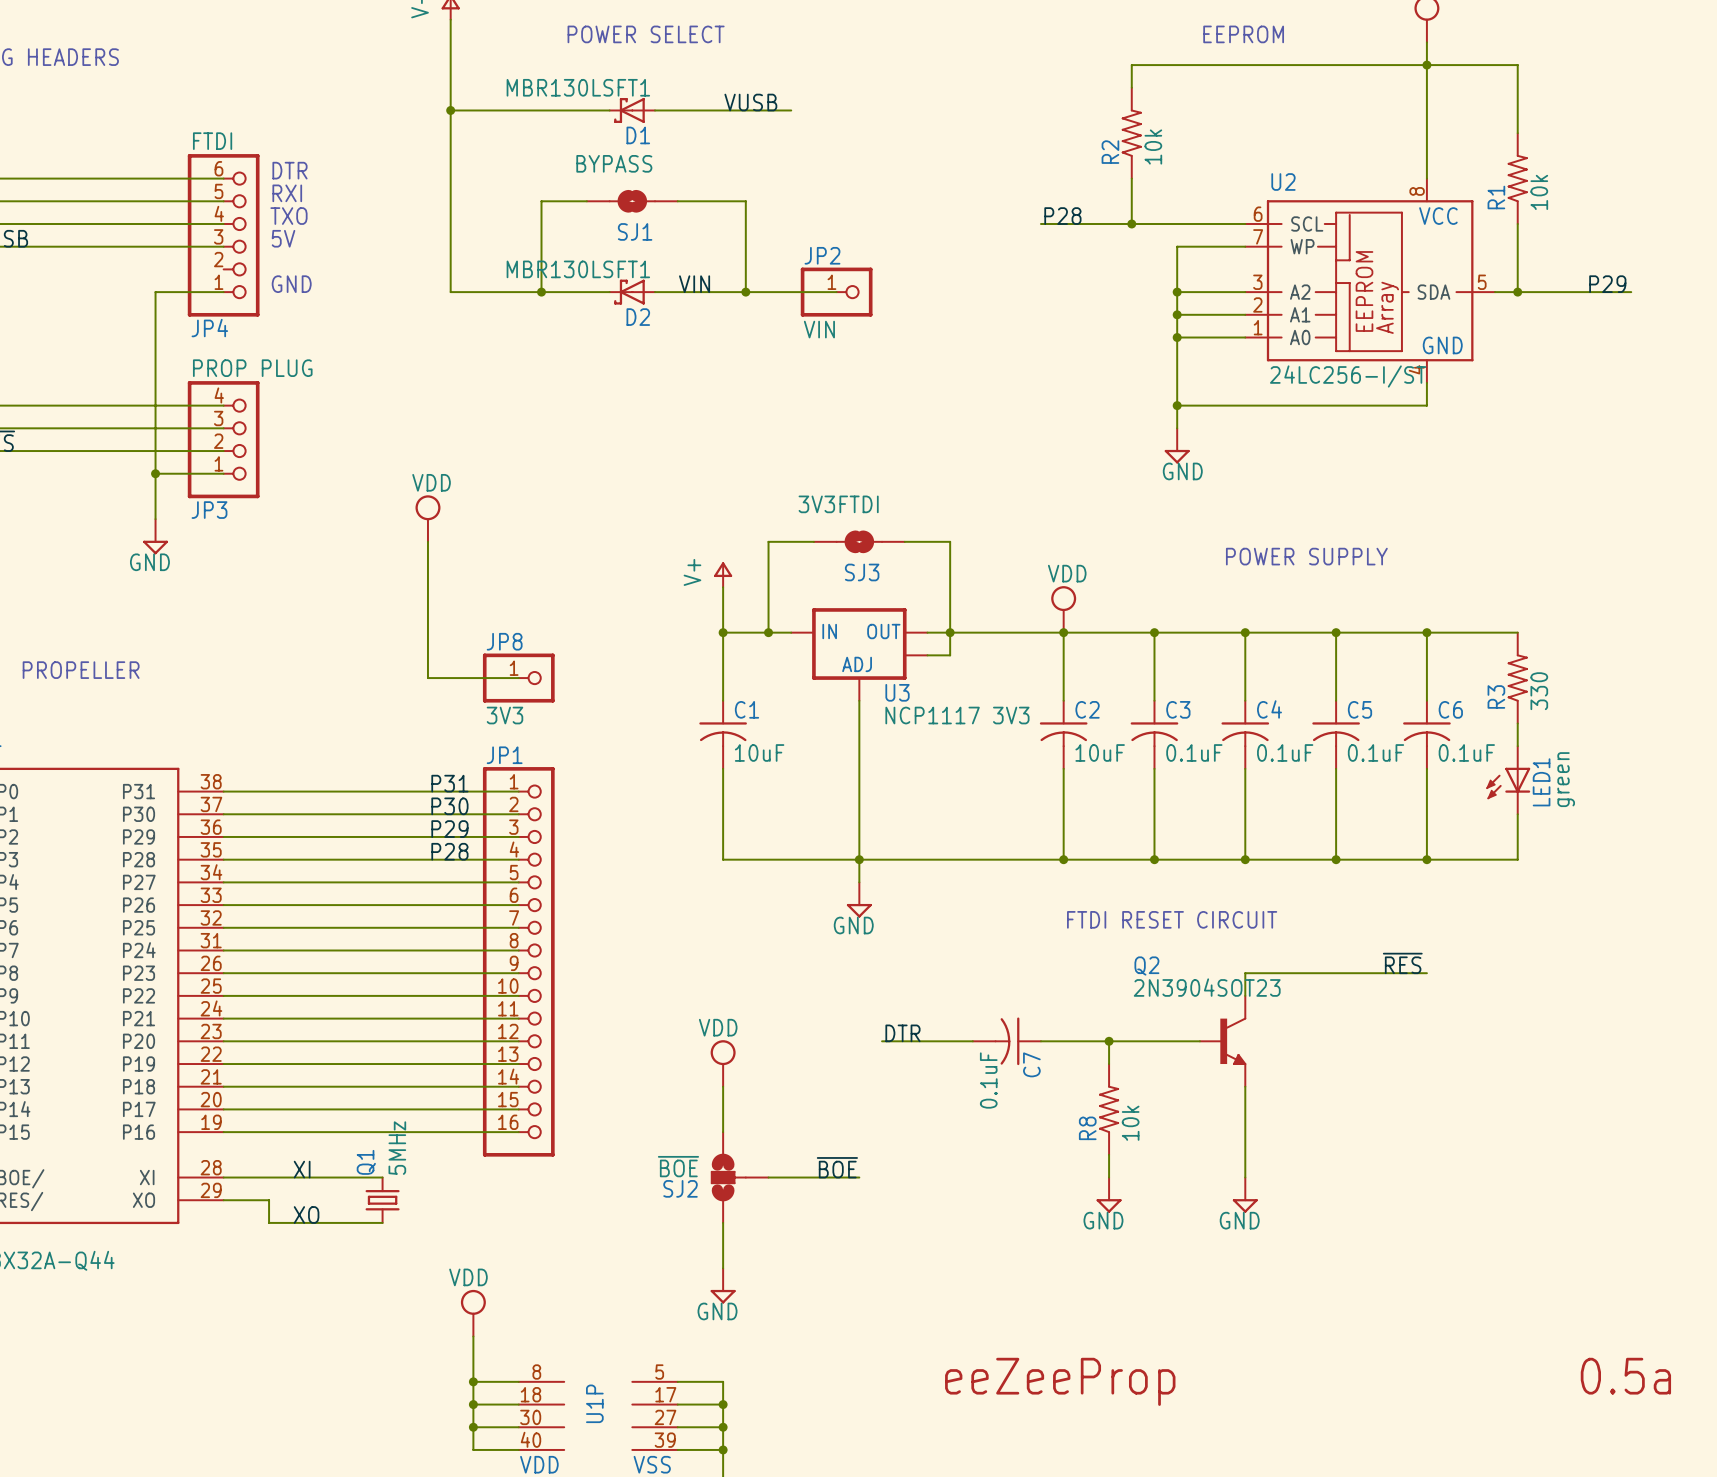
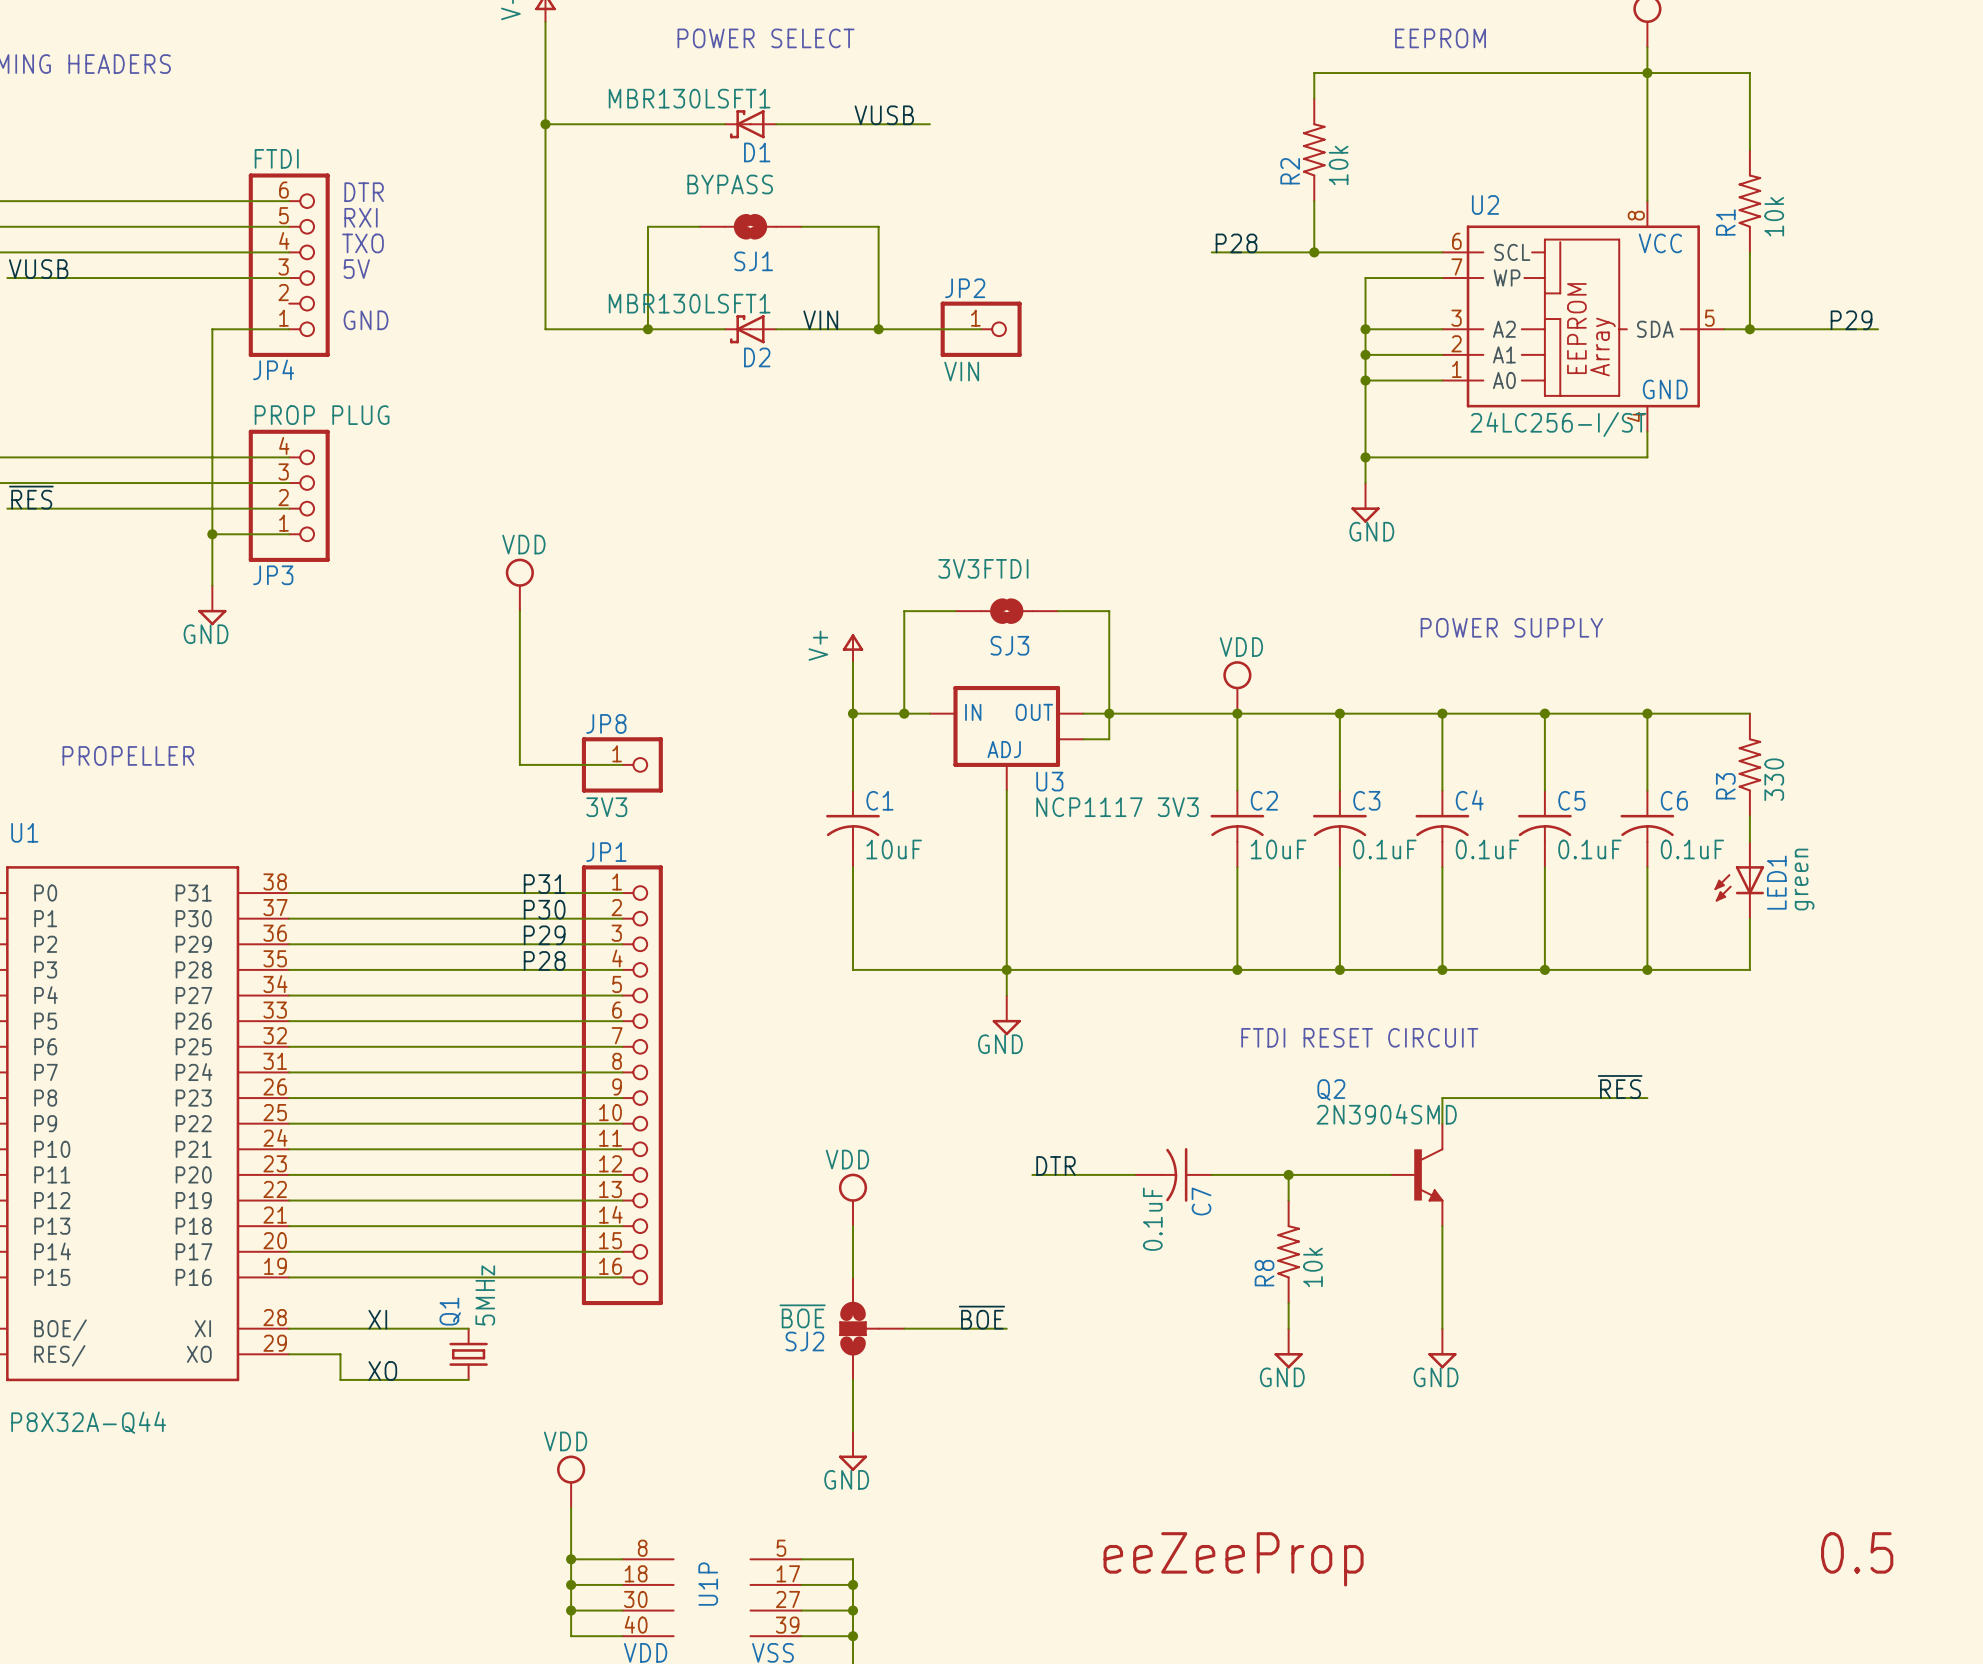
Q2 value: 2N3904SOT23 (1207, 987) -> 2N3904SMD (1386, 1114)
text: 0.5a (1625, 1376) -> 0.5 (1857, 1552)

